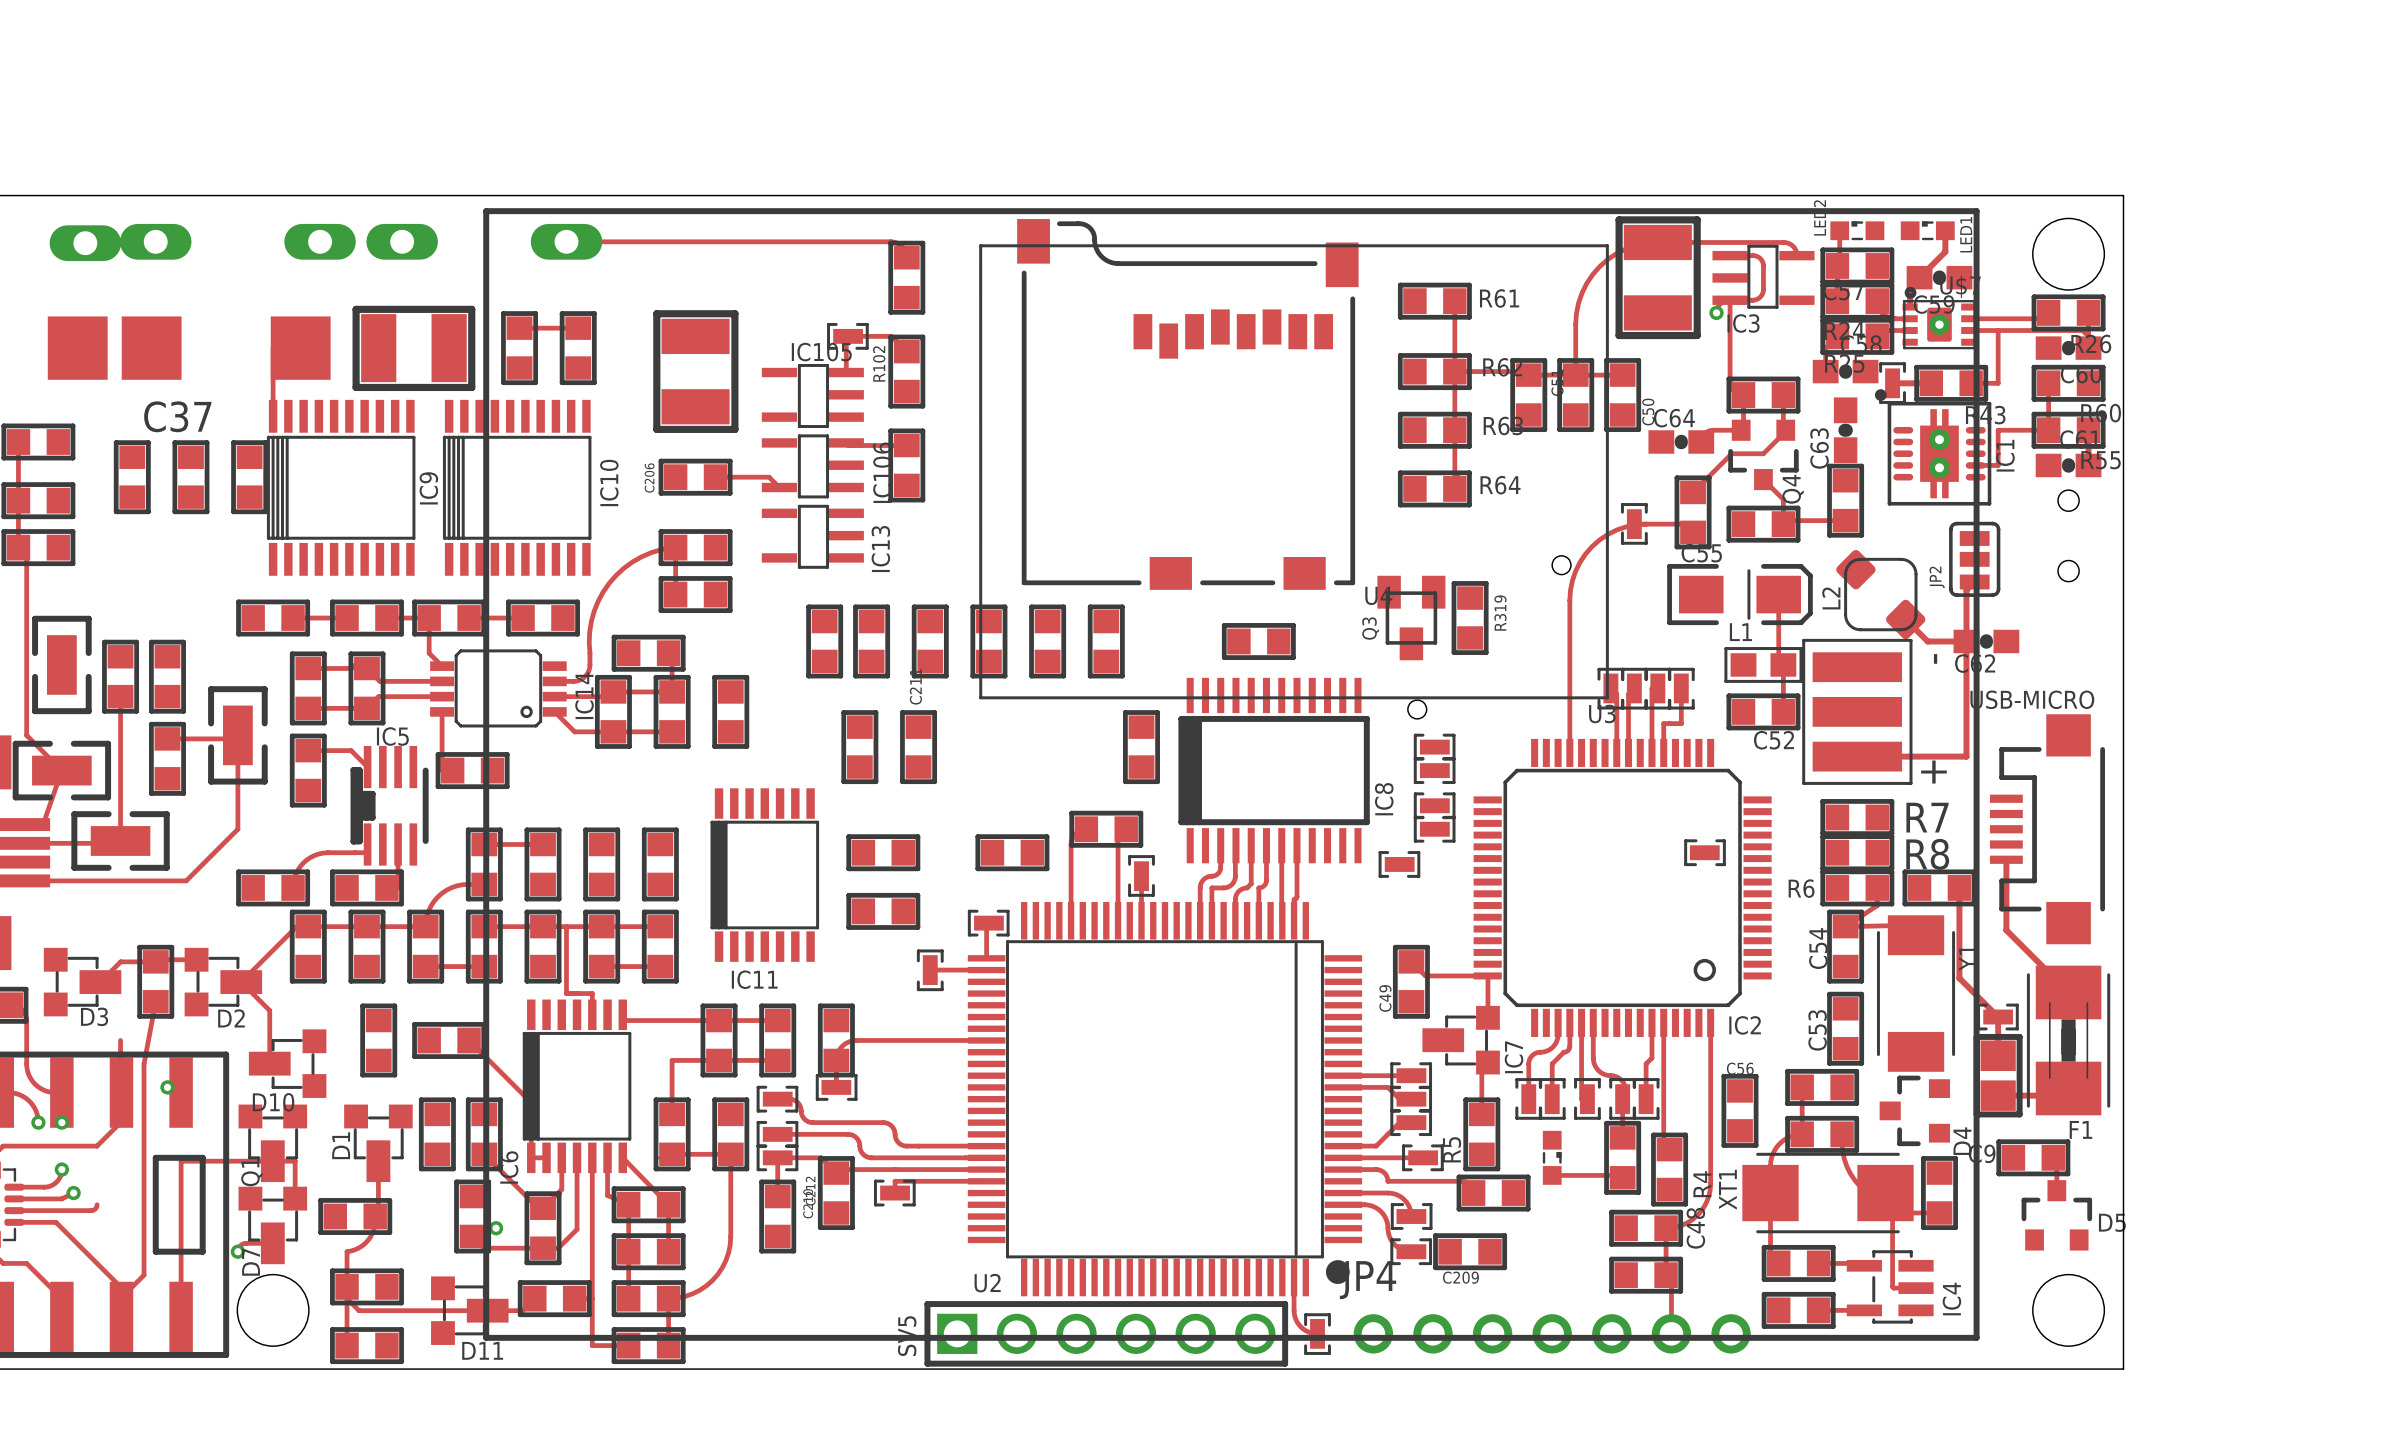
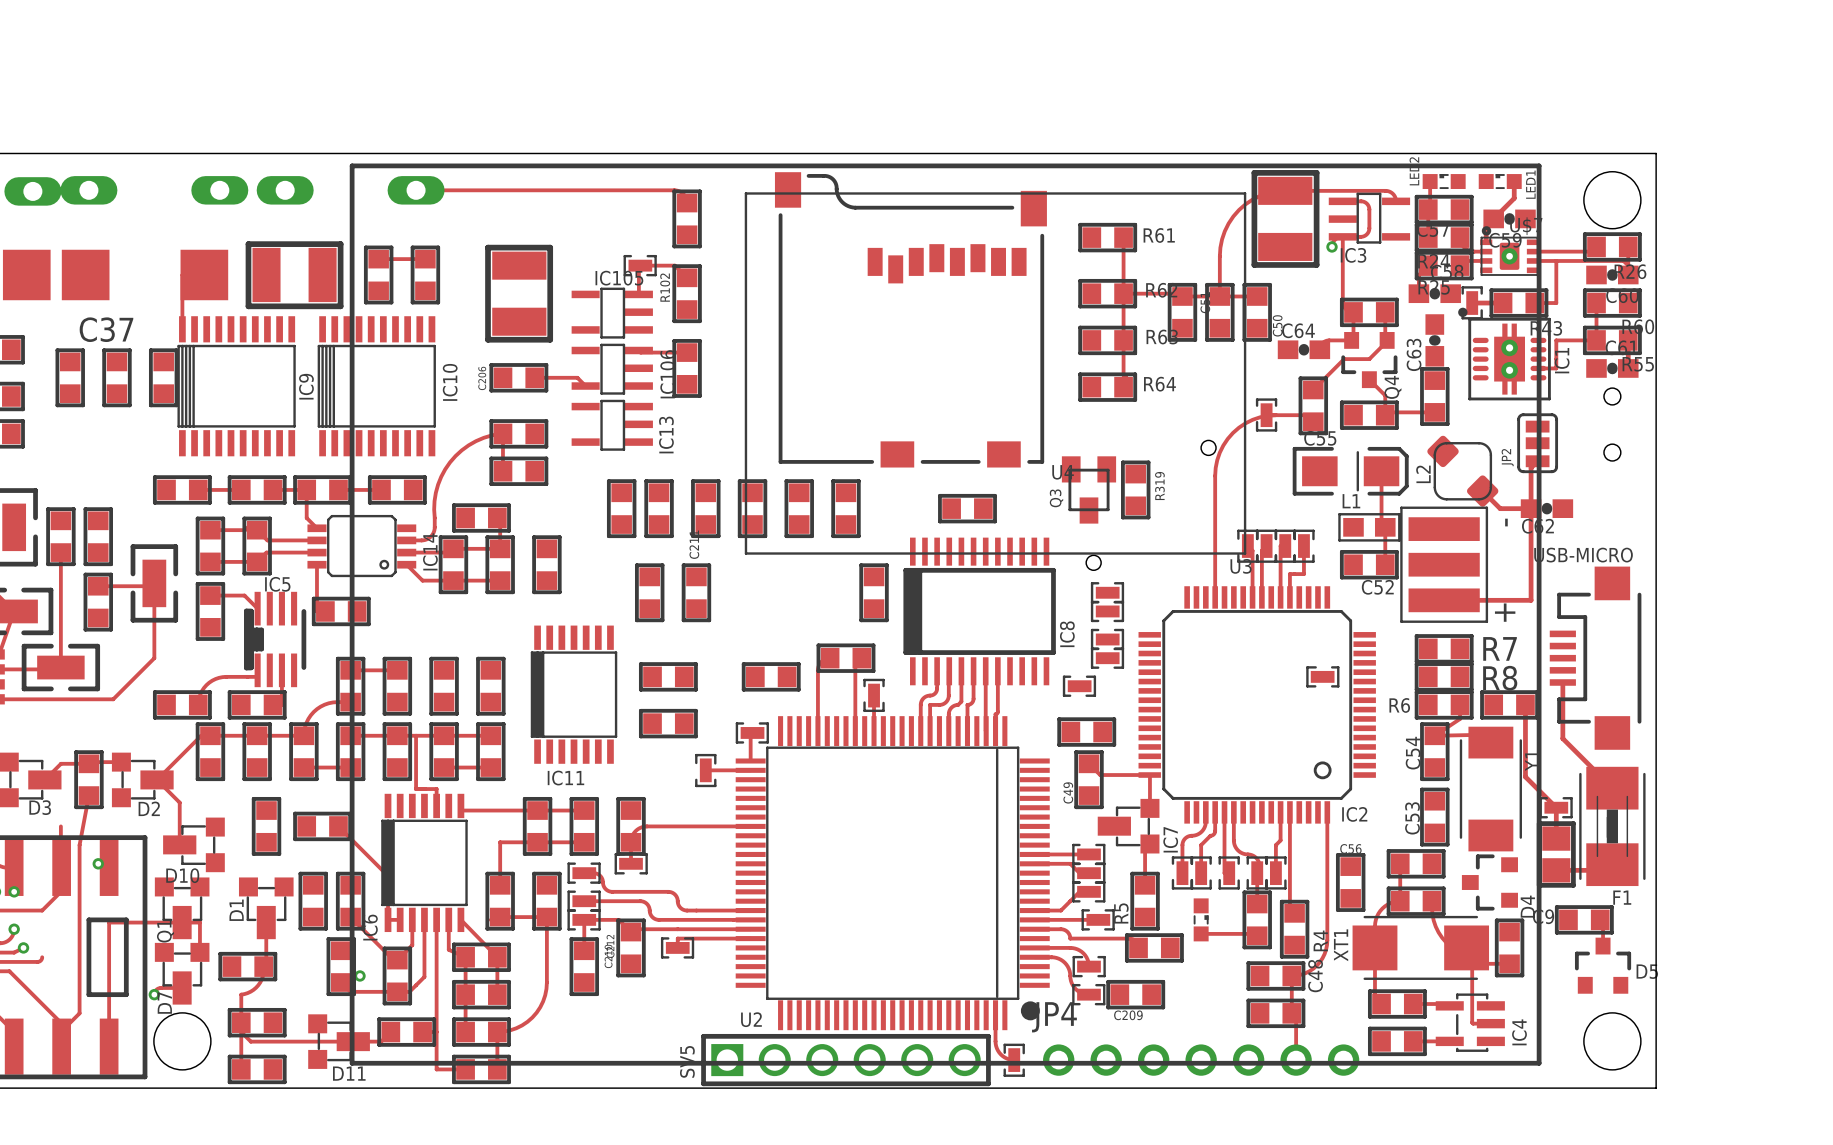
part: none -> (1086, 732)

